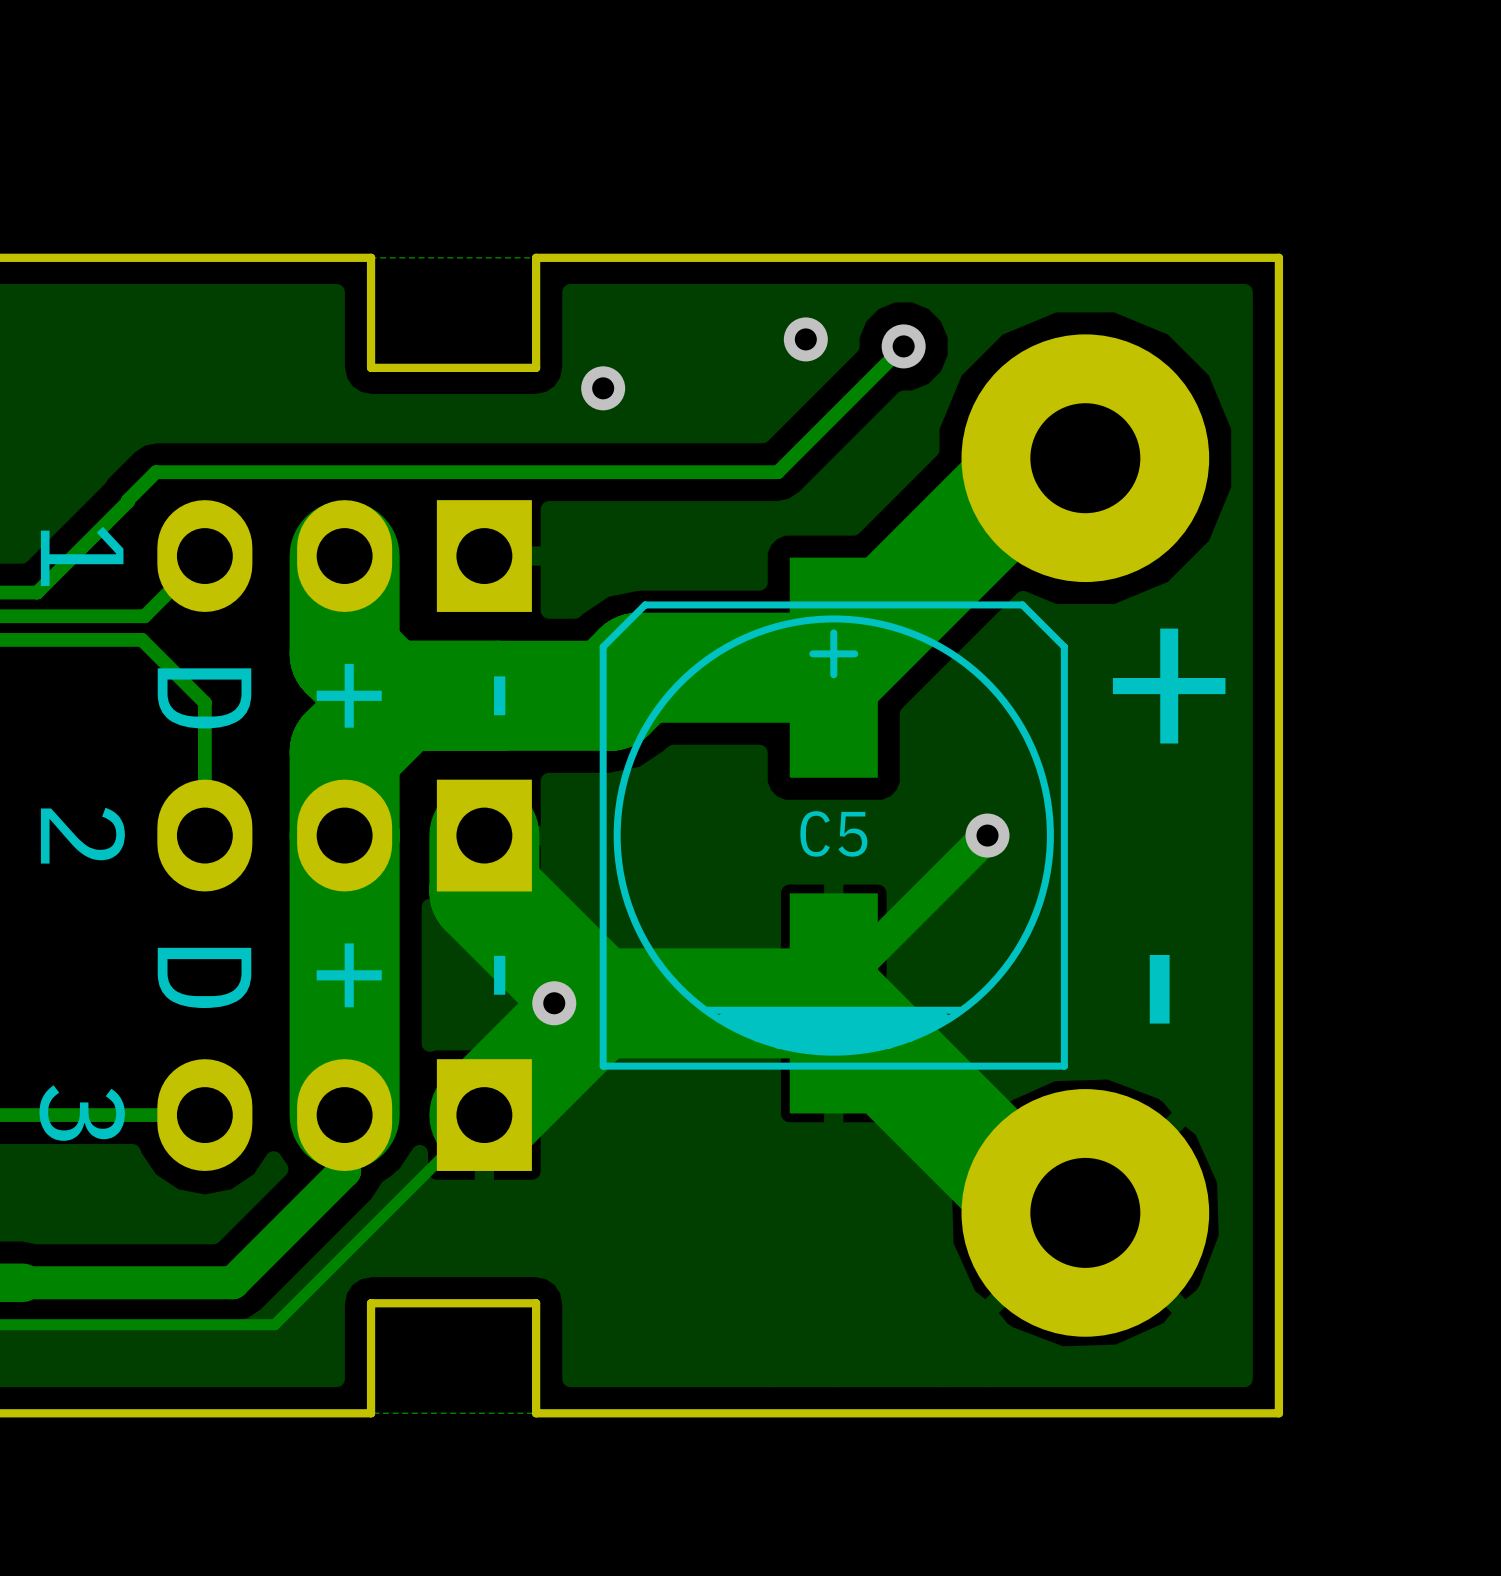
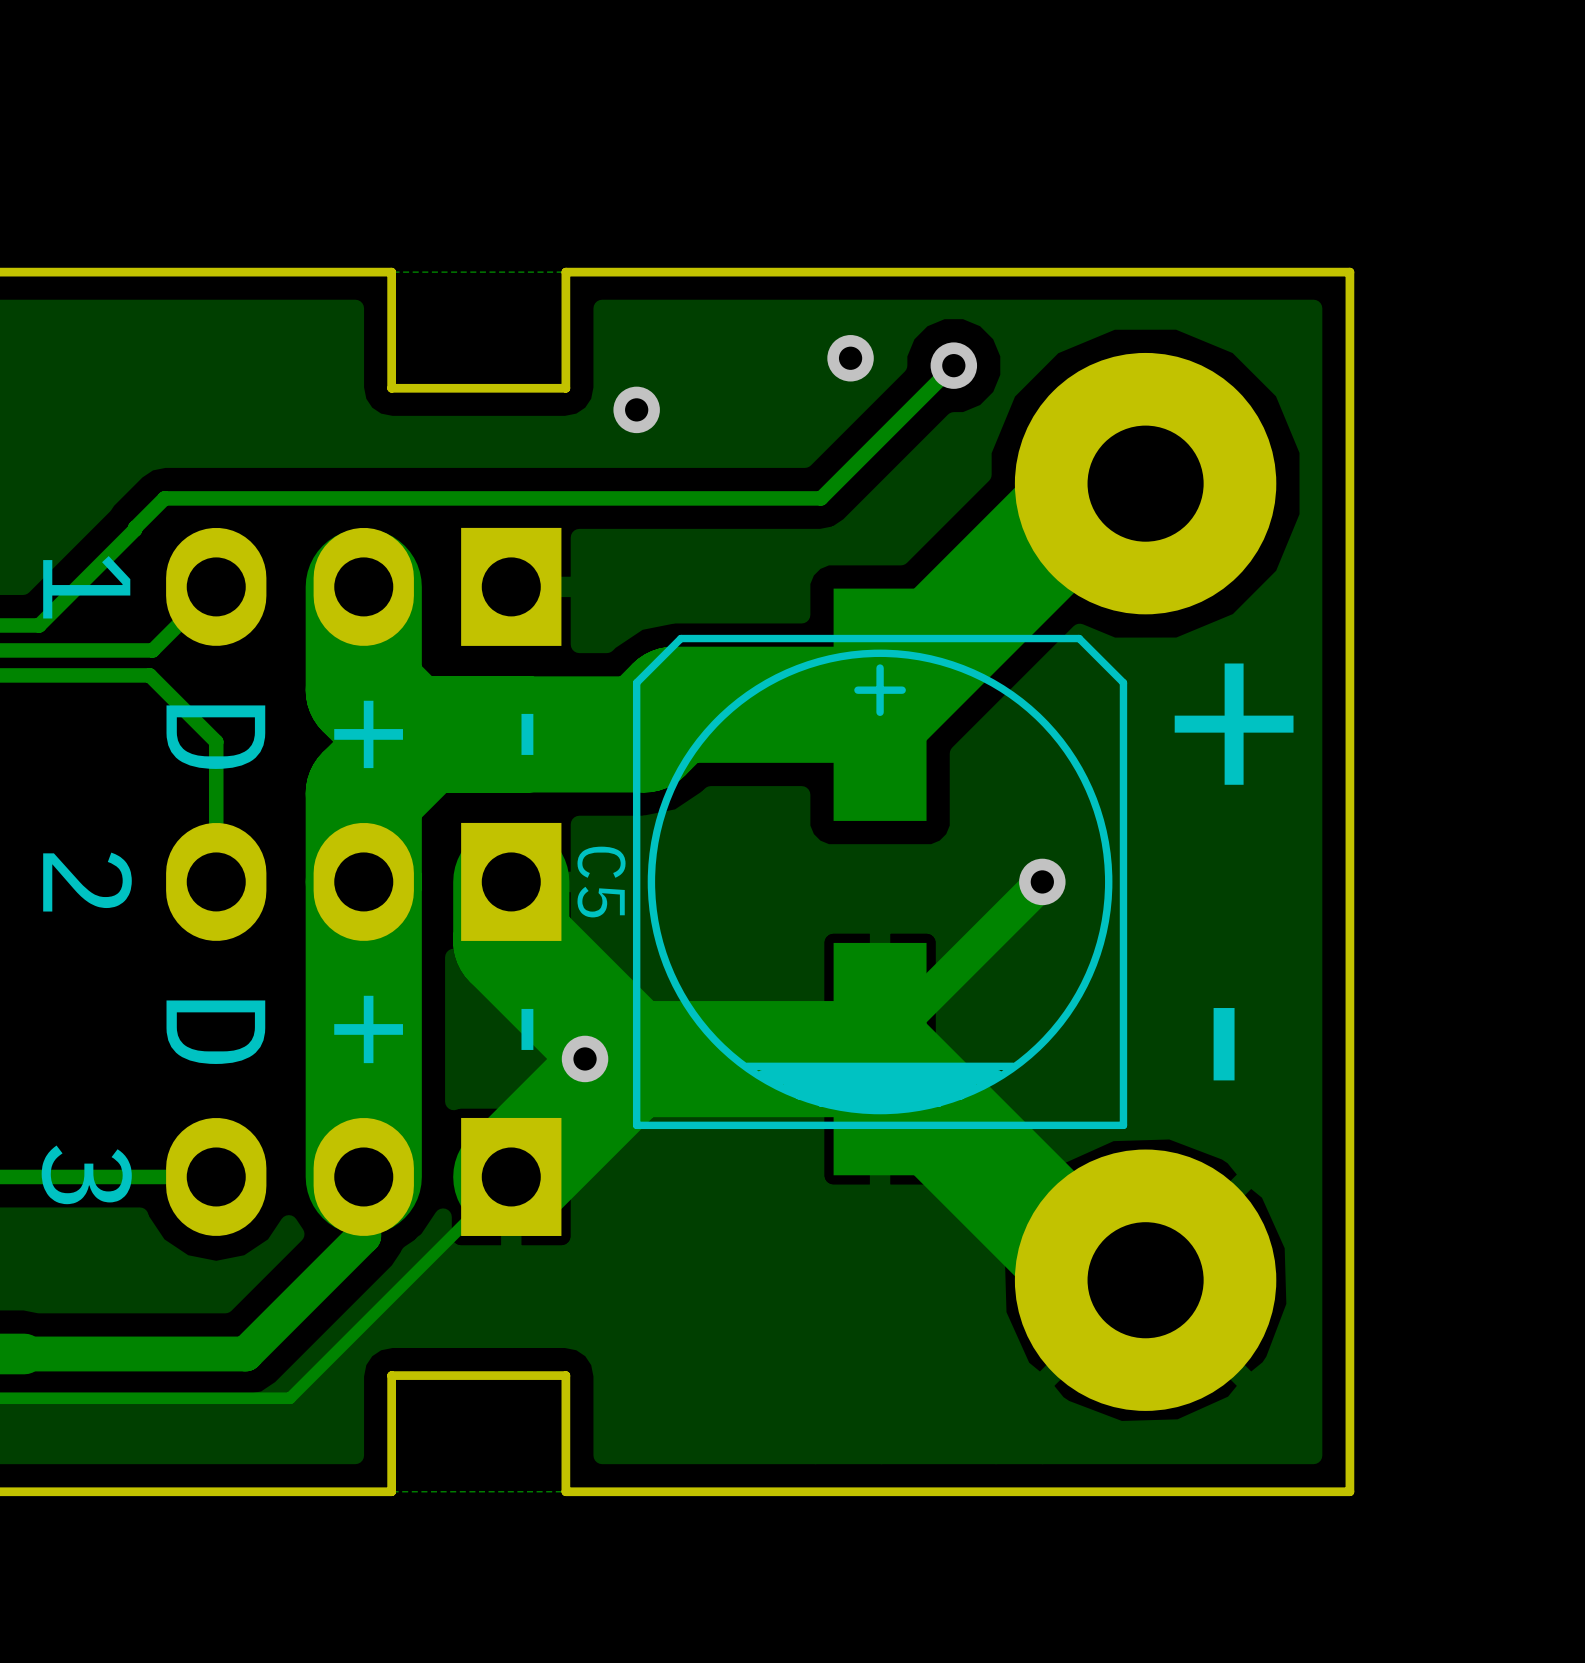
C5 name rotation: 0° (833, 833) -> 90° clockwise (601, 882)
C5 name position: C5 (833, 833) -> C5 (601, 882)

